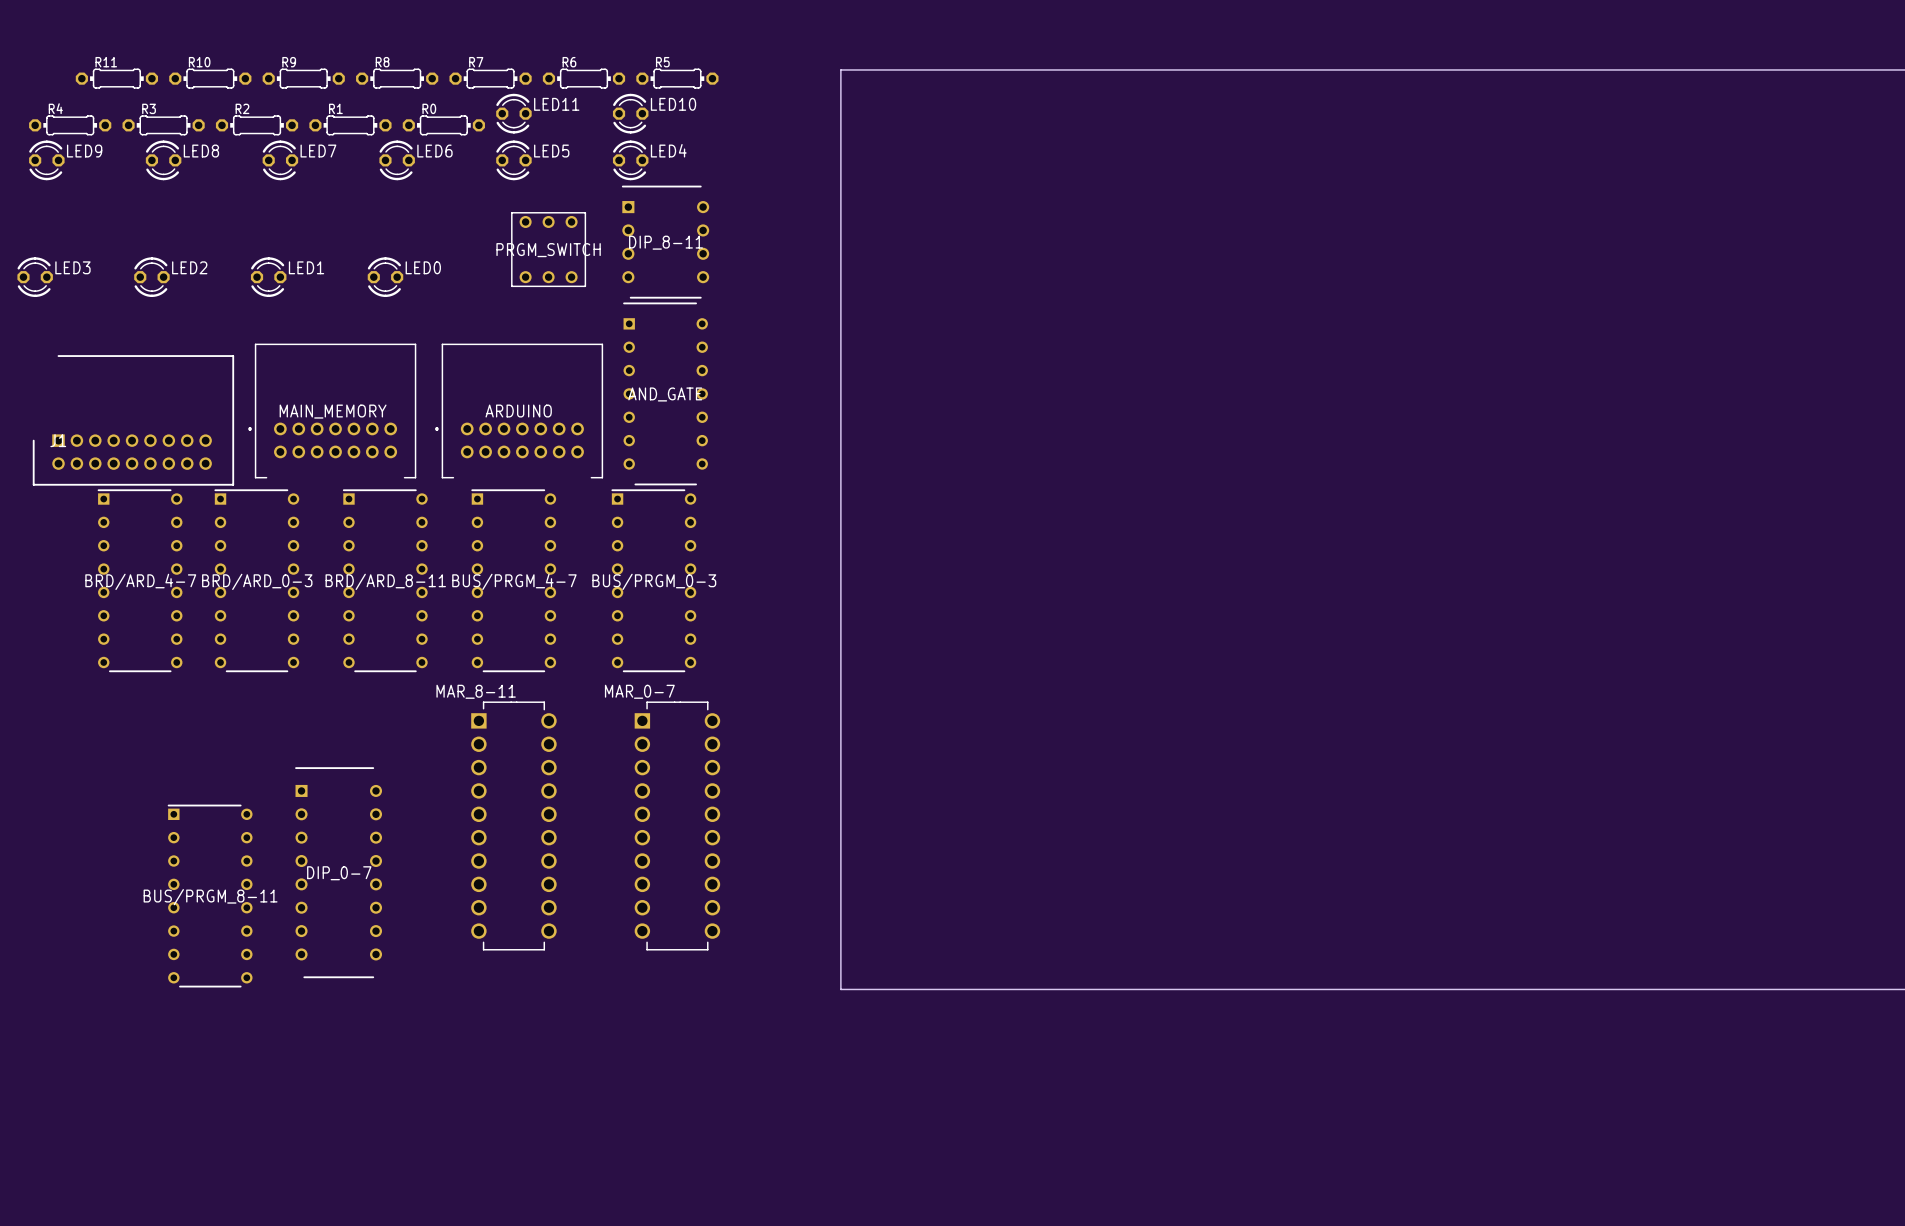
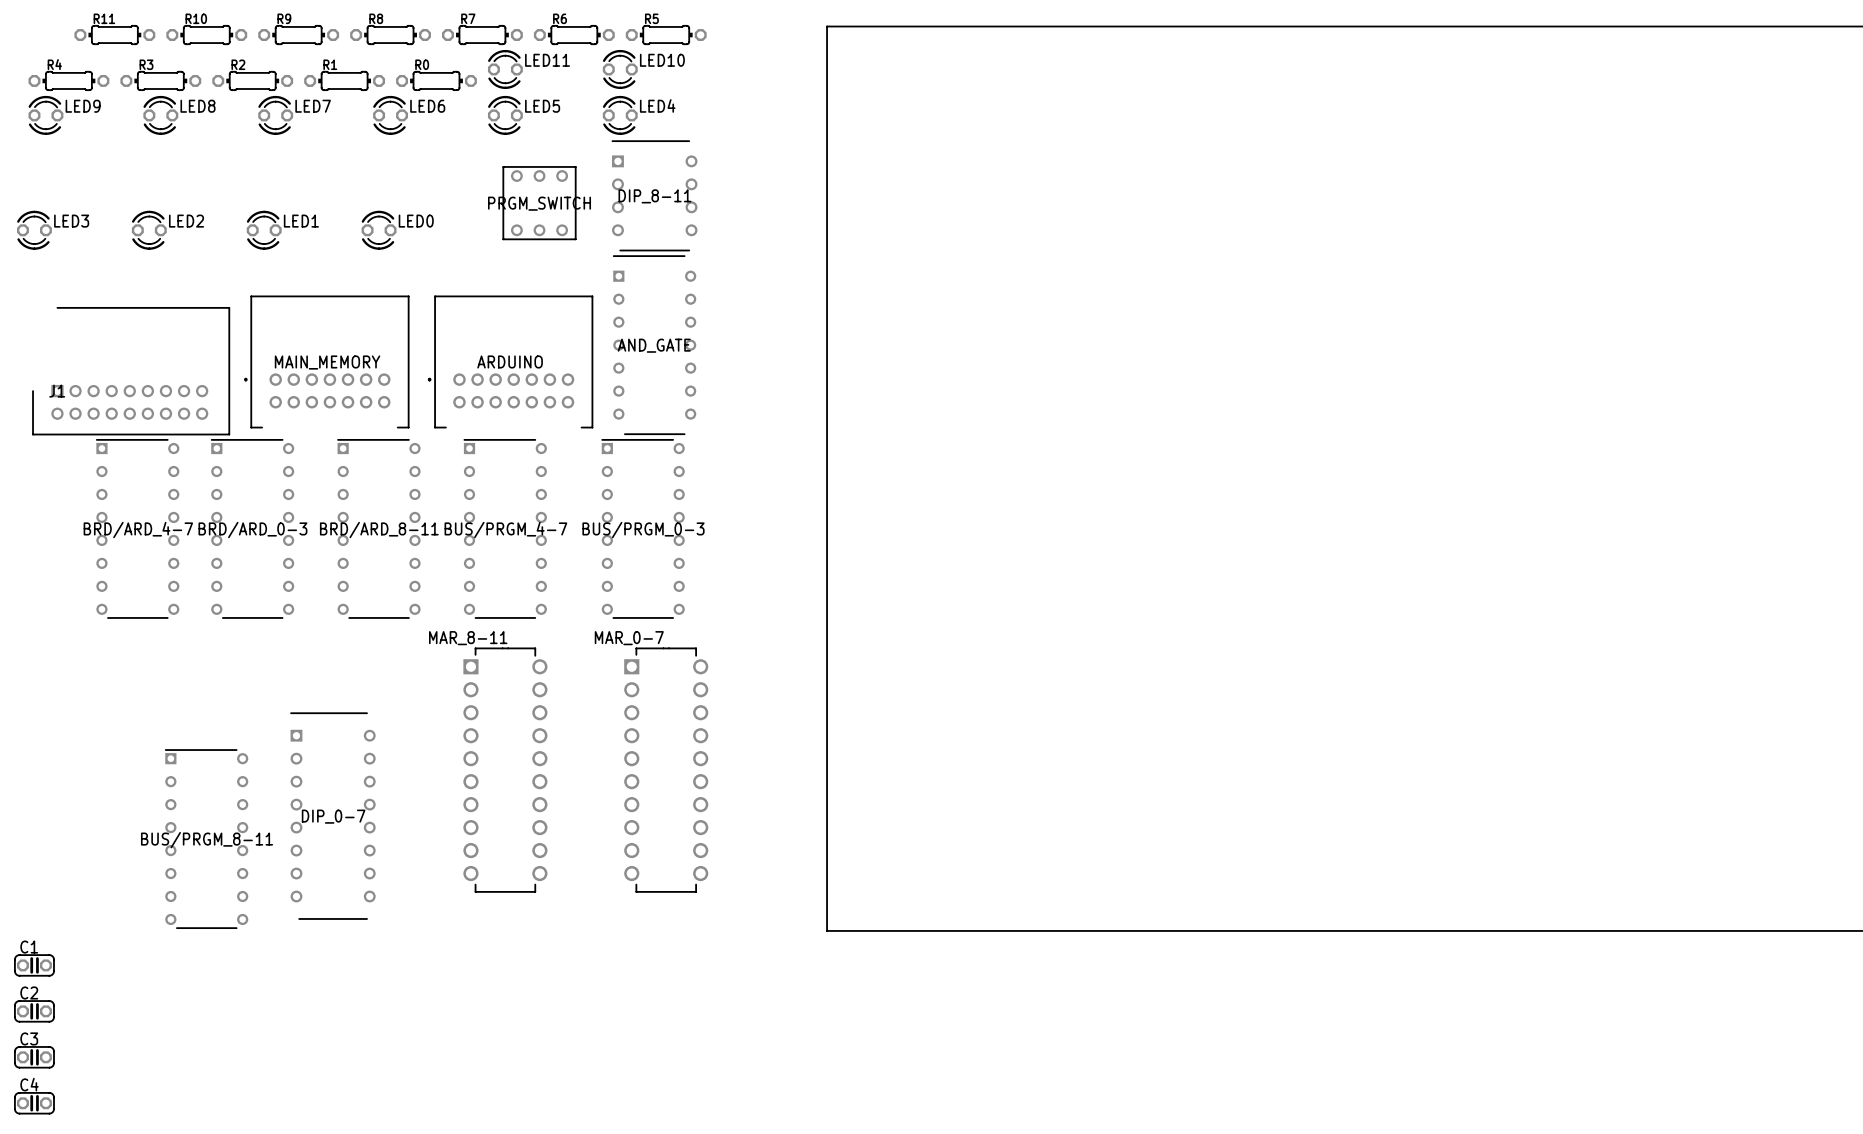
C1: none -> (34, 965)
C2: none -> (34, 1011)
C3: none -> (34, 1057)
C4: none -> (34, 1103)

